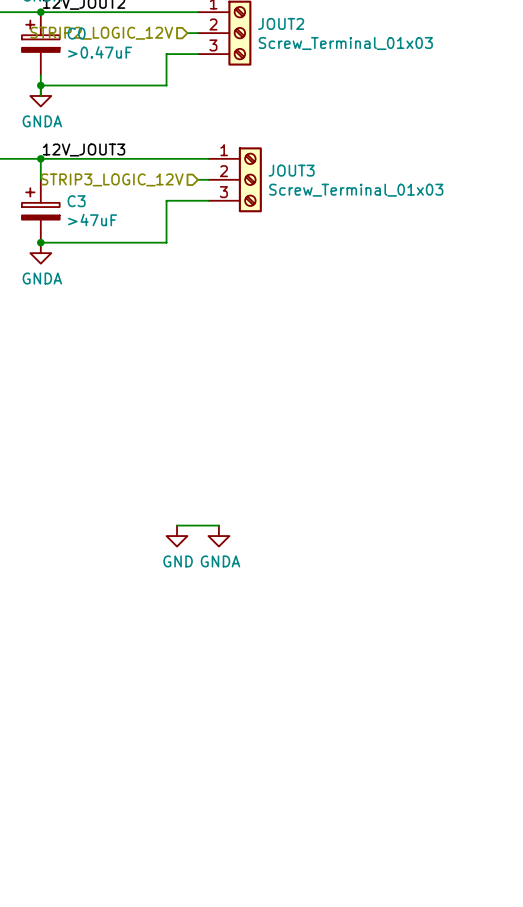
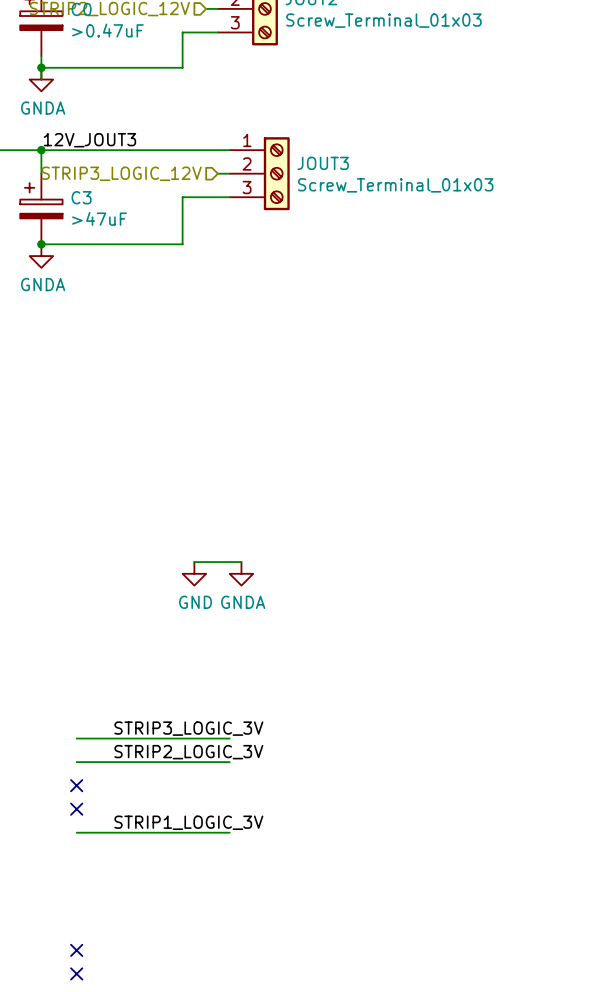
label: none -> STRIP3_LOGIC_3V (188, 728)
wire: none -> (76, 738) (229, 738)
label: none -> STRIP2_LOGIC_3V (188, 752)
wire: none -> (76, 762) (229, 762)
no-connect mark: none -> (76, 785)
no-connect mark: none -> (76, 809)
label: none -> STRIP1_LOGIC_3V (188, 822)
wire: none -> (76, 832) (229, 832)
no-connect mark: none -> (76, 950)
no-connect mark: none -> (76, 973)

